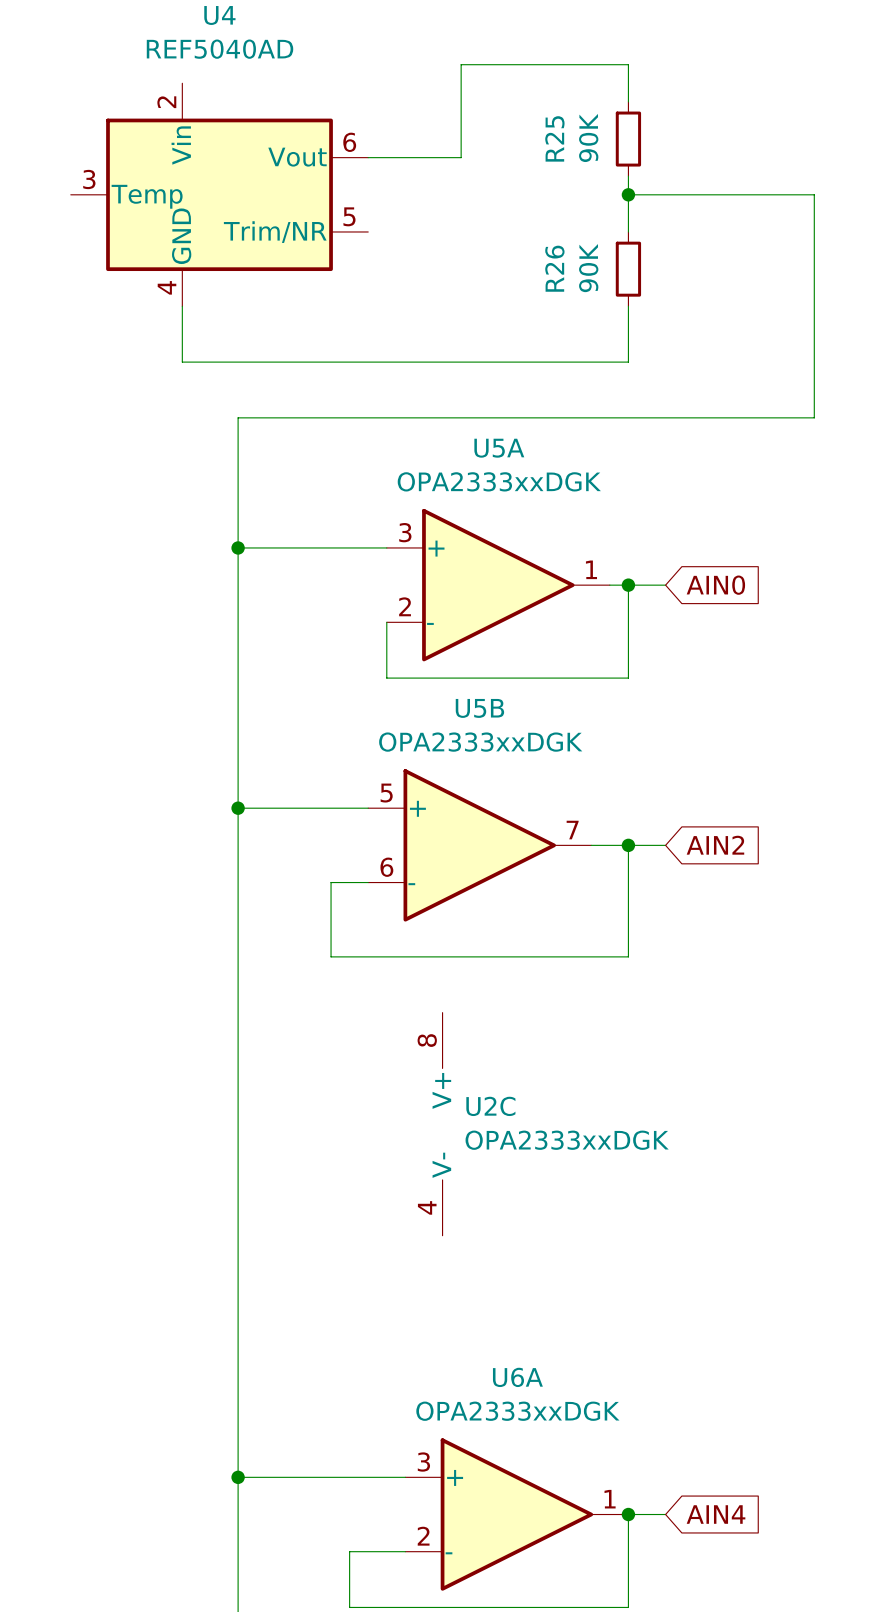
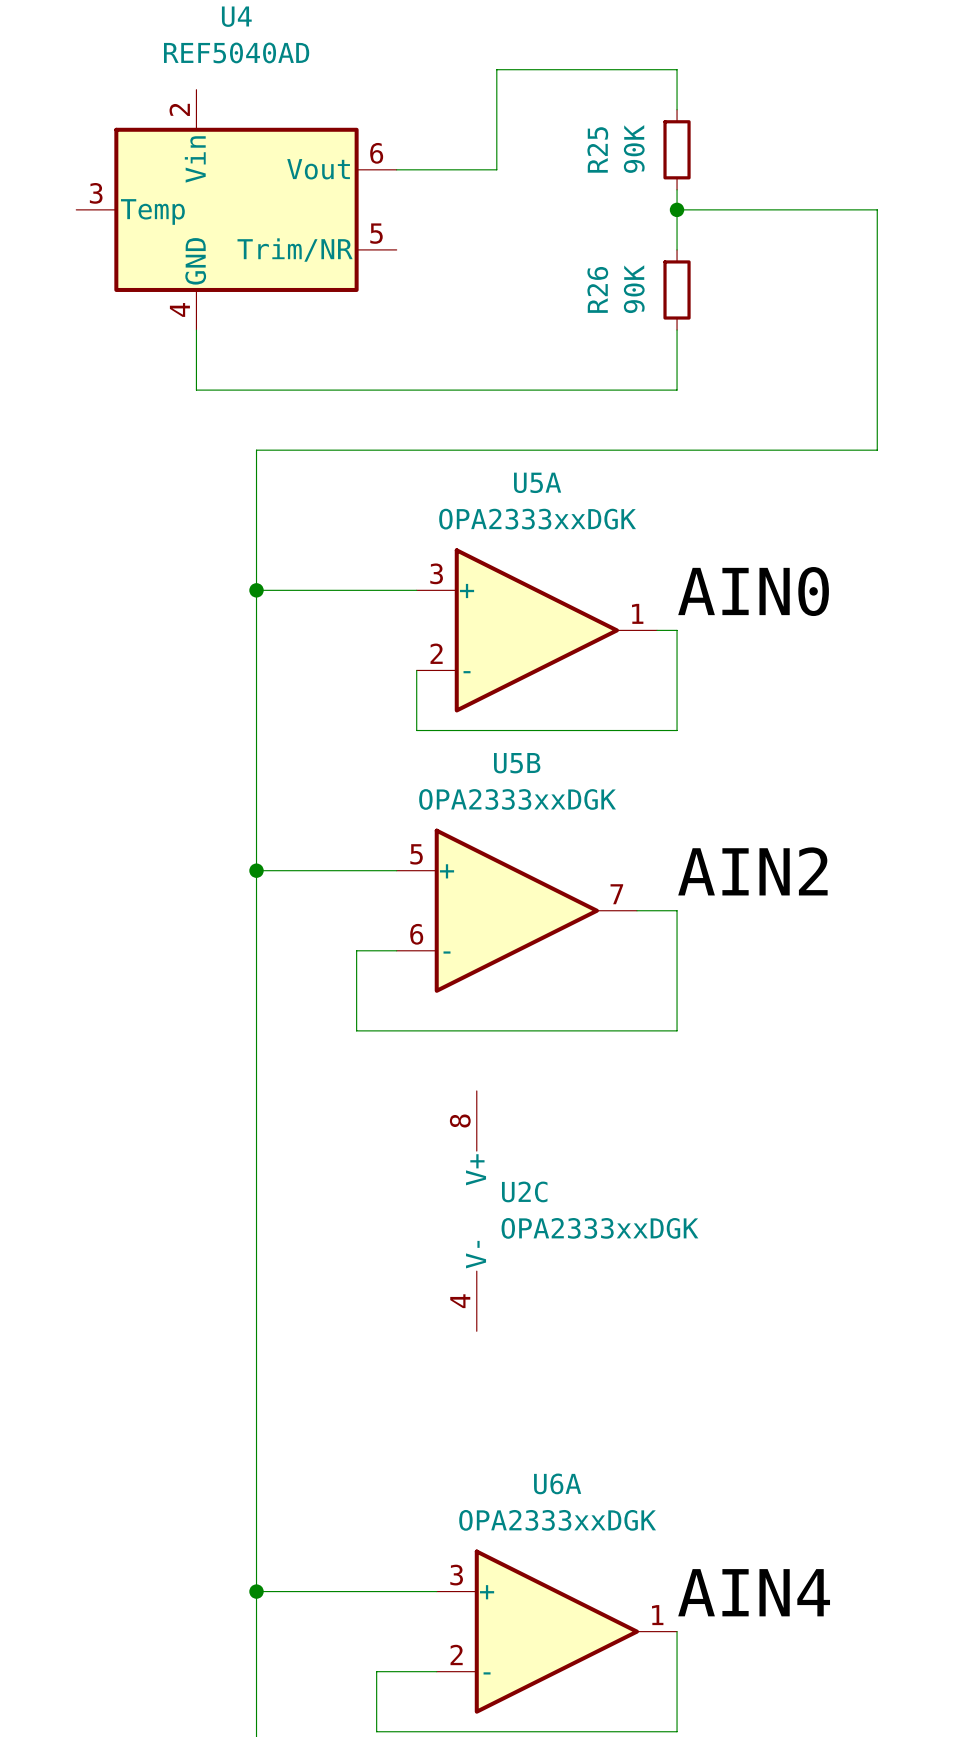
label: none -> AIN0 (753, 591)
wire: (628, 585) (665, 585) -> none
junction: (628, 585) -> none
global label: AIN0 (715, 585) -> none
label: none -> AIN2 (752, 871)
wire: (628, 845) (665, 845) -> none
junction: (628, 845) -> none
global label: AIN2 (715, 845) -> none
label: none -> AIN4 (754, 1592)
wire: (628, 1514) (665, 1514) -> none
junction: (628, 1514) -> none
global label: AIN4 (716, 1514) -> none

